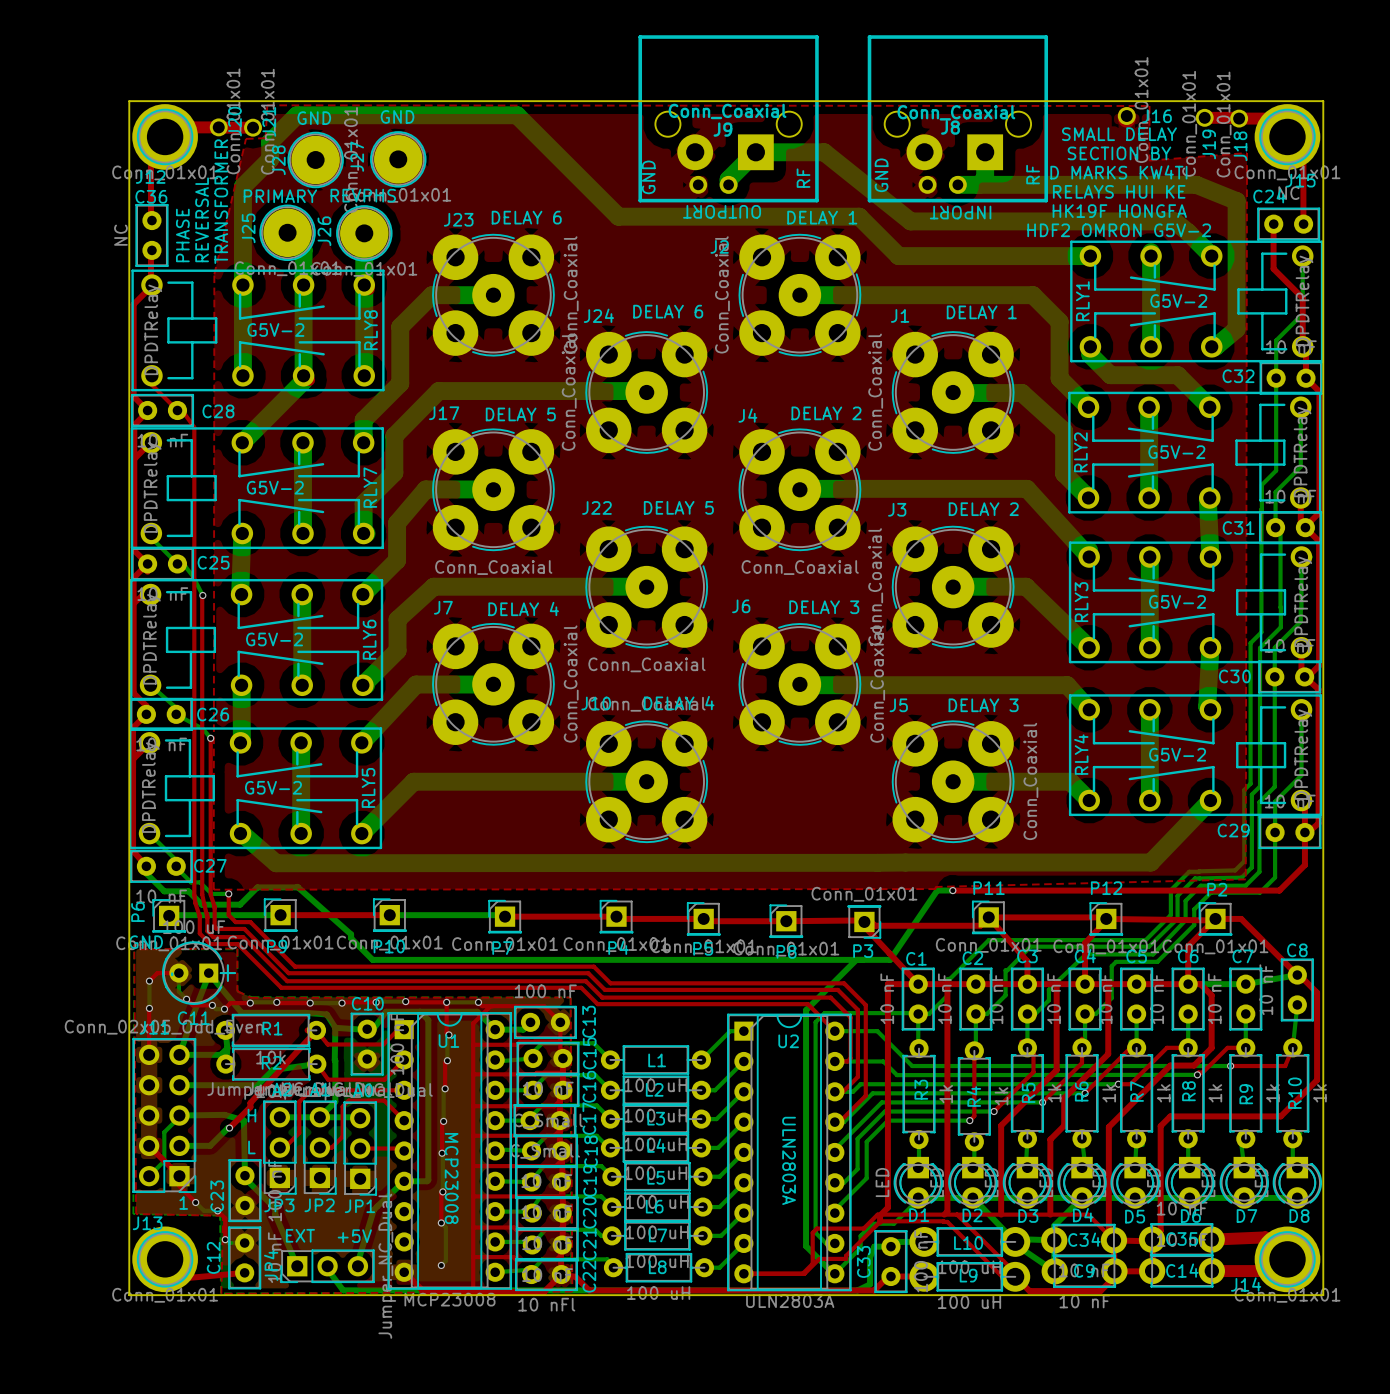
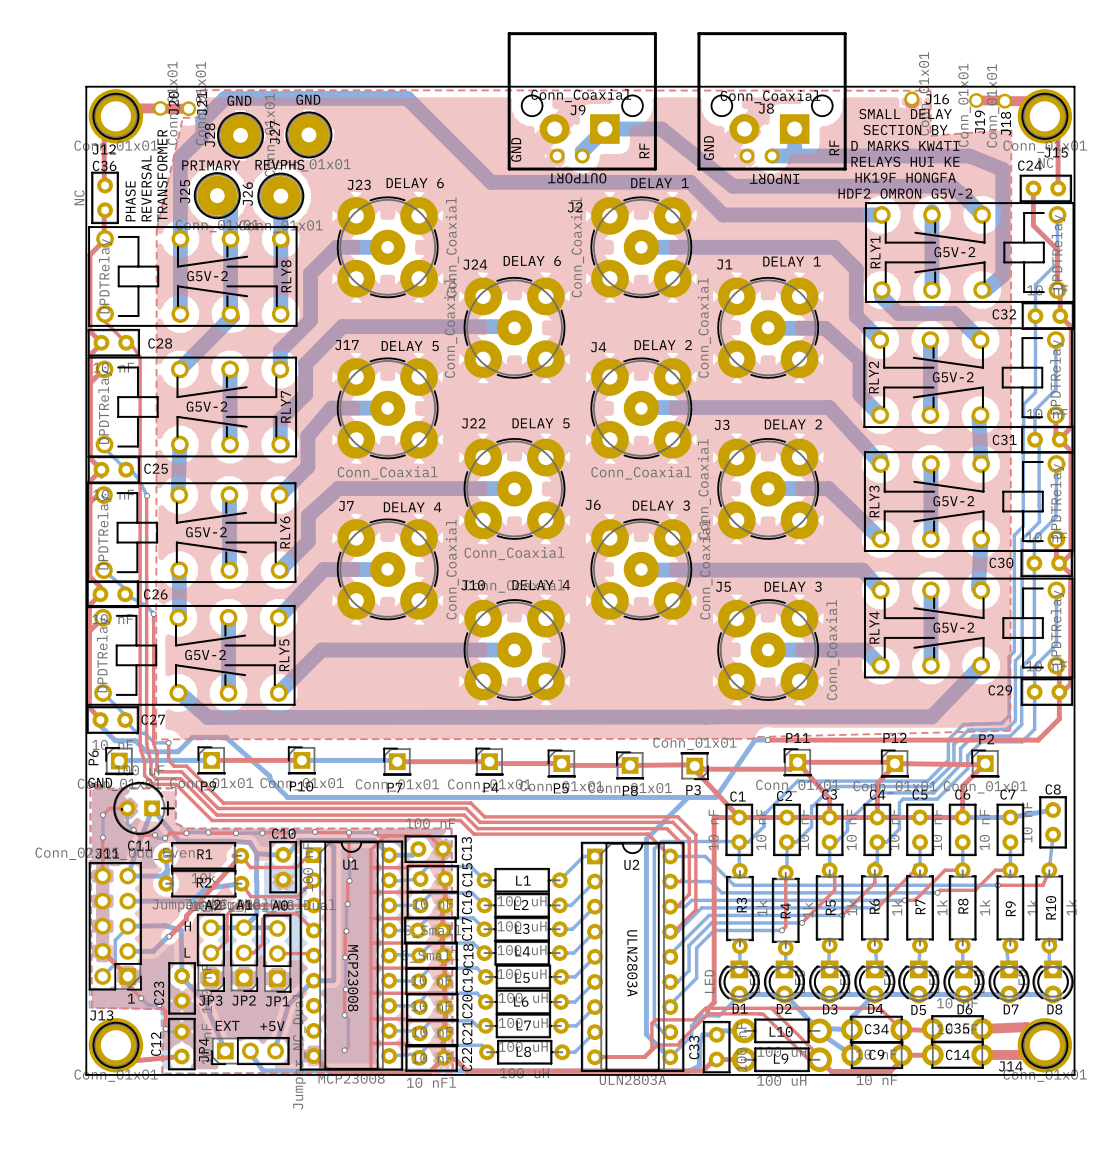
top track: (1215, 918) (1241, 918) (1317, 992) (1317, 1080) (1280, 1116) (1170, 1116) (1160, 1126) (1160, 1230) (1152, 1239) -> none
top track: (947, 984) (947, 1211) (944, 1214) -> none
top track: (1056, 984) (1056, 1070) (1001, 1125) (1001, 1214) -> none
top track: (1108, 984) (1108, 1054) (1064, 1098) (1064, 1125) (1050, 1139) (1050, 1214) -> none
top track: (1188, 984) (1200, 984) (1211, 995) (1211, 1048) (1194, 1065) (1170, 1065) (1108, 1127) (1108, 1235) (1113, 1240) -> none
top track: (1227, 1047) (1202, 1072) (1198, 1072) (1197, 1074) -> (995, 870) (975, 890) (940, 890) (937, 892)
bottom track: (1197, 1074) (897, 1075) -> (937, 892) (721, 892)
via position: (1197, 1074) -> (937, 892)

